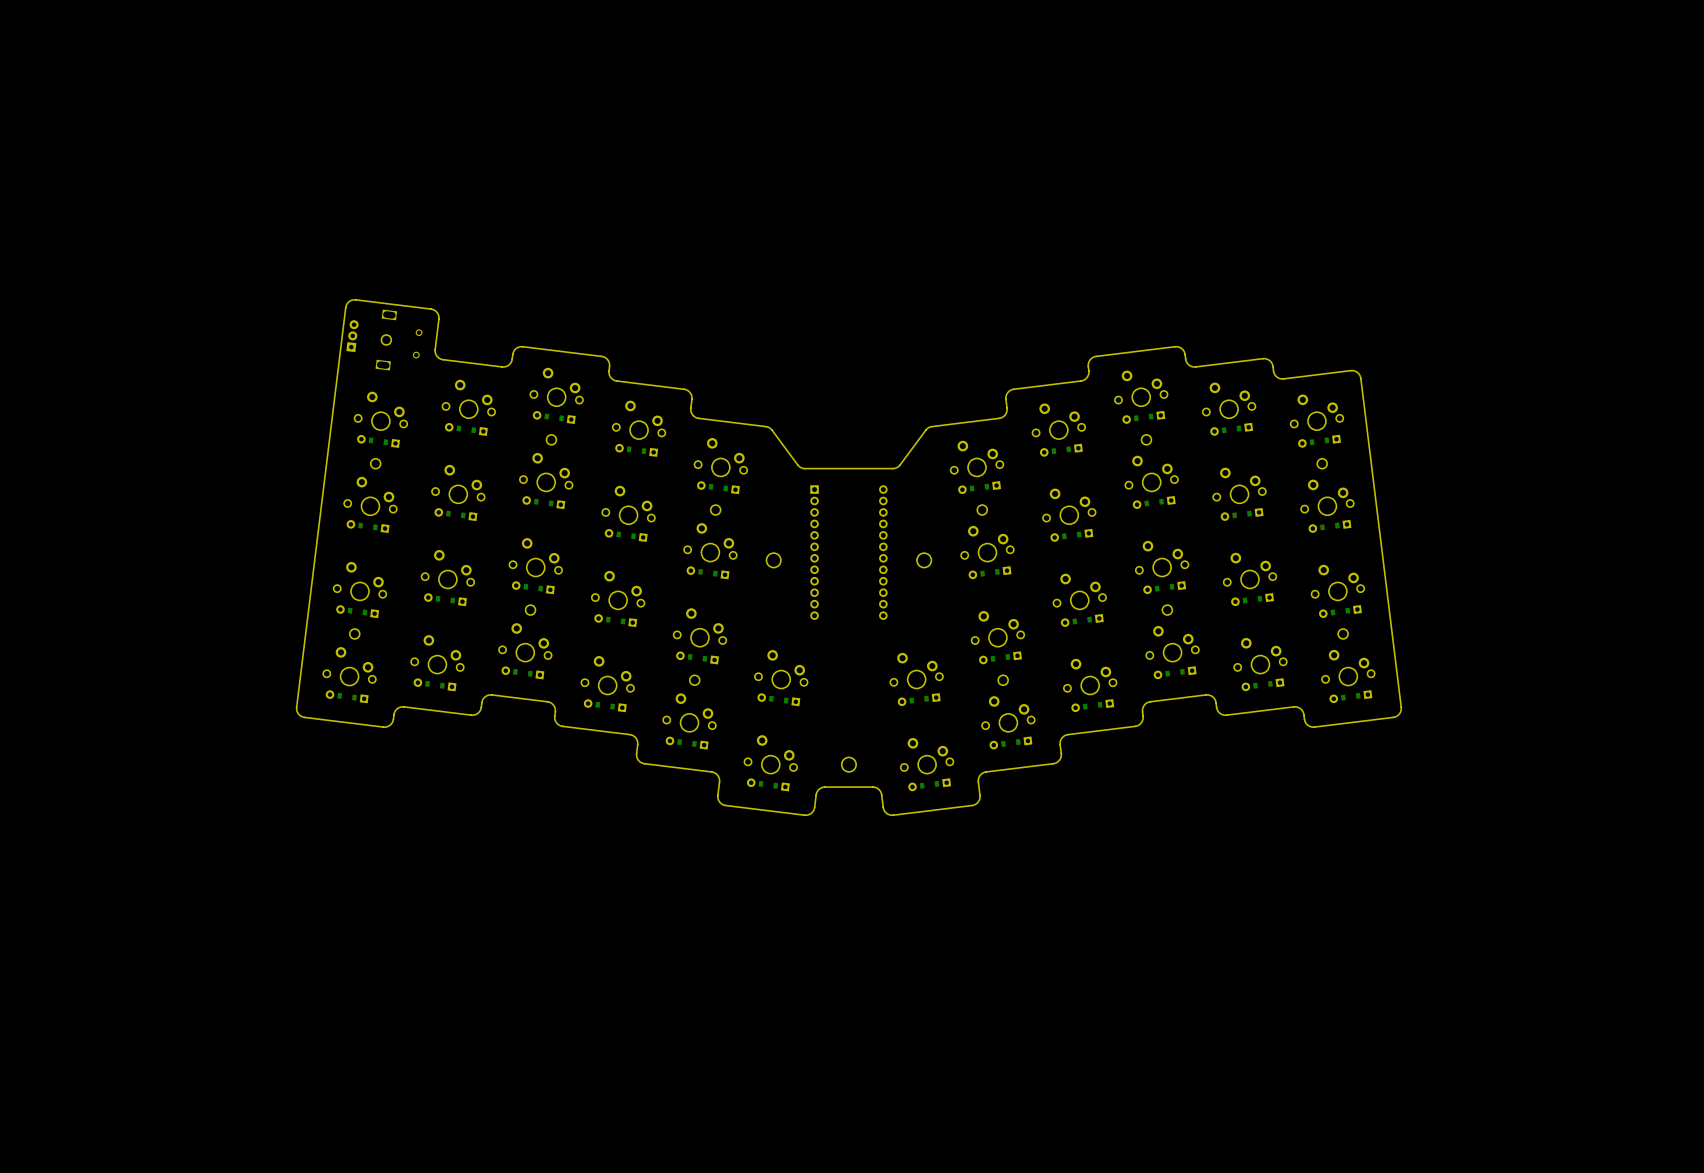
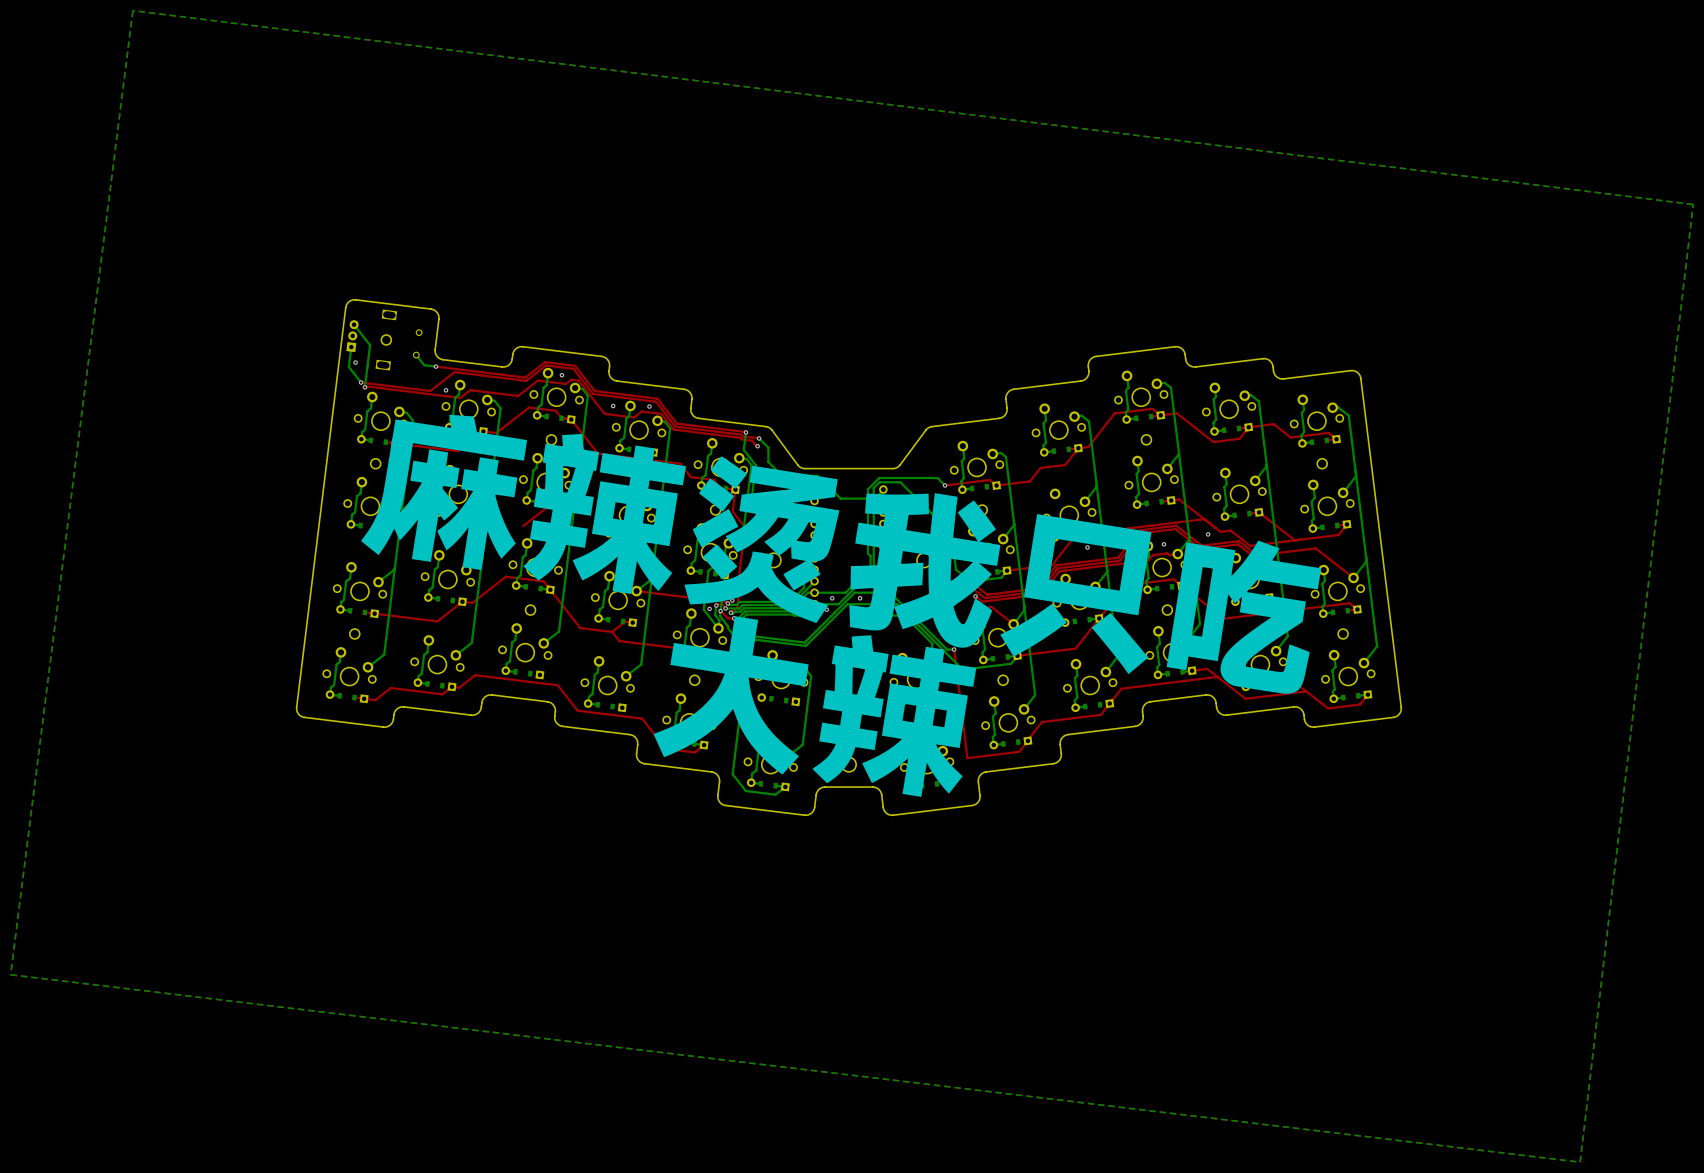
bottom zone outline: none -> (132, 10) (1693, 204) (1580, 1162) (10, 974) (132, 10)
bottom track: none -> (354, 324) (370, 345) (364, 387)
bottom track: none -> (351, 347) (348, 366) (361, 382)
bottom track: none -> (416, 355) (424, 365) (435, 366)
via: none -> (355, 362)
top track: none -> (435, 366) (525, 377) (545, 362) (575, 365) (594, 391) (657, 398) (677, 423) (745, 432)
via: none -> (435, 366)
bottom track: none -> (548, 373) (541, 404) (538, 407) (537, 415) (546, 416)
via: none -> (561, 375)
bottom track: none -> (1127, 375) (1128, 387) (1125, 390) (1128, 409) (1125, 412) (1126, 419) (1136, 418)
top track: none -> (361, 382) (430, 391) (454, 372) (526, 380) (545, 365) (573, 368) (593, 394) (655, 401) (675, 426) (759, 438)
via: none -> (361, 382)
bottom track: none -> (1156, 383) (1164, 382) (1170, 387) (1199, 624) (1188, 639)
bottom track: none -> (460, 385) (459, 394) (455, 397) (449, 427) (458, 428)
top track: none -> (364, 387) (460, 397) (470, 390) (518, 396) (537, 380) (565, 384) (571, 379) (578, 380) (604, 413) (634, 417) (641, 411) (661, 413) (673, 429) (740, 437) (752, 440) (757, 446)
via: none -> (364, 387)
bottom track: none -> (575, 387) (582, 388) (587, 395) (558, 631) (543, 643)
bottom track: none -> (1214, 387) (1216, 396) (1213, 399) (1216, 419) (1213, 422) (1214, 431) (1224, 430)
via: none -> (446, 390)
bottom track: none -> (1244, 395) (1250, 395) (1258, 401) (1287, 636) (1276, 651)
bottom track: none -> (372, 397) (370, 408) (367, 411) (365, 429) (362, 432) (361, 439) (371, 440)
bottom track: none -> (487, 399) (494, 400) (500, 408) (471, 642) (455, 655)
bottom track: none -> (1302, 399) (1304, 410) (1301, 412) (1304, 432) (1301, 435) (1302, 443) (1312, 442)
bottom track: none -> (630, 405) (624, 437) (620, 440) (619, 448) (629, 449)
via: none -> (613, 406)
via: none -> (649, 406)
bottom track: none -> (1332, 407) (1337, 407) (1348, 415) (1377, 646) (1364, 663)
bottom track: none -> (1044, 408) (1046, 420) (1043, 423) (1045, 442) (1043, 445) (1044, 452) (1053, 451)
bottom track: none -> (399, 411) (406, 412) (412, 420) (384, 654) (368, 667)
drawing: none -> [361, 414, 1322, 797]
top track: none -> (1160, 415) (1152, 408) (1114, 413) (1088, 446) (1068, 449)
bottom track: none -> (1074, 416) (1081, 415) (1088, 421) (1117, 656) (1105, 672)
top track: none -> (1151, 416) (1176, 413) (1213, 442) (1239, 438) (1248, 427)
top track: none -> (561, 418) (555, 410) (529, 407) (496, 433) (483, 431) (458, 451) (385, 442)
top track: none -> (561, 418) (571, 419) (597, 453) (680, 463) (690, 477) (714, 479) (720, 487) (735, 489)
bottom track: none -> (657, 420) (664, 421) (670, 428) (641, 664) (626, 676)
top track: none -> (1238, 428) (1273, 424) (1290, 437) (1328, 432) (1336, 439) (1326, 440)
bottom track: none -> (745, 432) (743, 449) (755, 465) (752, 496)
via: none -> (745, 432)
bottom track: none -> (759, 438) (768, 447) (768, 462) (782, 475) (817, 475) (840, 498) (874, 498) (883, 489)
via: none -> (759, 438)
bottom track: none -> (712, 443) (711, 453) (708, 455) (705, 475) (702, 477) (701, 485) (711, 486)
via: none -> (757, 446)
bottom track: none -> (962, 446) (964, 458) (961, 461) (963, 478) (961, 481) (962, 489) (972, 488)
top track: none -> (1078, 448) (1065, 464) (1040, 468) (1030, 481) (996, 485) (989, 480) (945, 485)
bottom track: none -> (992, 453) (1000, 452) (1005, 456) (1035, 695) (1024, 709)
bottom track: none -> (1179, 453) (1167, 468)
bottom track: none -> (537, 458) (536, 468) (533, 470) (530, 490) (527, 492) (526, 500) (536, 501)
bottom track: none -> (739, 458) (746, 459) (751, 465) (743, 532) (726, 545) (724, 558) (708, 570) (703, 609) (718, 628) (719, 620) (715, 615) (716, 605)
bottom track: none -> (1137, 461) (1139, 493) (1136, 497) (1137, 504) (1146, 503)
bottom track: none -> (1266, 464) (1255, 480)
bottom track: none -> (1225, 472) (1226, 484) (1224, 487) (1226, 505) (1224, 509) (1224, 516) (1234, 515)
bottom track: none -> (1356, 476) (1343, 492)
bottom track: none -> (361, 482) (350, 524) (360, 525)
bottom track: none -> (1313, 484) (1314, 497) (1311, 501) (1312, 528) (1322, 527)
bottom track: none -> (945, 485) (937, 478) (879, 478) (867, 489) (867, 494)
via: none -> (945, 485)
bottom track: none -> (1096, 486) (1084, 501)
top track: none -> (735, 489) (732, 511) (745, 527) (737, 607) (730, 612)
bottom track: none -> (873, 493) (873, 488) (879, 482) (900, 482) (951, 533) (956, 569) (971, 581) (1001, 577) (1007, 570) (997, 571)
top track: none -> (1161, 501) (1179, 499) (1220, 531) (1230, 530) (1250, 545) (1338, 534) (1346, 524) (1337, 525)
top track: none -> (552, 503) (523, 526)
bottom track: none -> (867, 507) (867, 553) (870, 556) (870, 567) (845, 592) (808, 592) (792, 608) (744, 608) (740, 611) (730, 612)
bottom track: none -> (873, 507) (873, 569) (838, 604) (801, 604) (793, 611) (745, 611) (738, 618) (734, 618)
top track: none -> (1249, 513) (1259, 512) (1294, 540)
top track: none -> (1204, 519) (1079, 534)
bottom track: none -> (1014, 524) (1003, 539)
bottom track: none -> (701, 528) (700, 537) (697, 540) (695, 560) (691, 563) (690, 570) (700, 571)
top track: none -> (1088, 533) (1075, 534) (1052, 565) (997, 571)
via: none -> (1208, 534)
bottom track: none -> (1189, 539) (1177, 554)
bottom track: none -> (527, 543) (520, 575) (517, 578) (516, 585) (525, 586)
via: none -> (1163, 544)
bottom track: none -> (1147, 546) (1147, 589) (1157, 588)
via: none -> (1087, 547)
top track: none -> (1177, 554) (1152, 555) (1148, 560) (1059, 571) (1041, 594) (982, 601) (975, 596)
bottom track: none -> (439, 555) (432, 587) (429, 590) (428, 597) (438, 598)
bottom track: none -> (1366, 561) (1353, 577)
top track: none -> (1265, 566) (1238, 544) (1200, 548) (1175, 529) (1141, 533) (1120, 560) (1057, 568) (1039, 591) (984, 598) (974, 590)
bottom track: none -> (351, 567) (350, 578) (346, 581) (340, 609) (350, 610)
bottom track: none -> (1106, 567) (1107, 571) (1095, 586)
bottom track: none -> (394, 568) (378, 582)
bottom track: none -> (814, 569) (804, 580) (804, 587) (789, 601) (739, 601) (736, 604) (727, 603)
bottom track: none -> (1323, 570) (1323, 613) (1332, 612)
bottom track: none -> (715, 573) (725, 574) (719, 615) (733, 635) (726, 698) (739, 716) (732, 774) (745, 791) (775, 794) (785, 786) (775, 785)
bottom track: none -> (609, 576) (608, 588) (605, 590) (603, 606) (599, 609) (598, 618) (608, 619)
bottom track: none -> (651, 577) (636, 591)
top track: none -> (1353, 577) (1315, 548) (1257, 555) (1238, 541) (1201, 545) (1176, 525) (1139, 530) (1118, 557) (1056, 565) (1038, 588) (987, 594) (974, 584) (962, 586)
bottom track: none -> (814, 581) (791, 605) (742, 605) (739, 608) (725, 608)
bottom track: none -> (540, 588) (550, 589)
top track: none -> (636, 591) (726, 602)
via: none -> (975, 596)
via: none -> (832, 598)
via: none -> (860, 598)
via: none -> (732, 600)
via: none -> (727, 603)
top track: none -> (716, 605) (722, 604) (725, 608)
via: none -> (716, 605)
bottom track: none -> (1024, 605) (1024, 609) (1013, 624)
via: none -> (709, 608)
via: none -> (725, 608)
top track: none -> (977, 608) (991, 606) (1013, 624)
via: none -> (826, 609)
top track: none -> (1347, 610) (1357, 609) (1349, 603) (1223, 618) (1173, 579) (1125, 585) (1075, 648) (1007, 656)
top track: none -> (720, 611) (727, 618) (734, 618)
via: none -> (720, 611)
top track: none -> (364, 612) (437, 621) (462, 601) (472, 602) (505, 576) (543, 581) (580, 628) (612, 631)
via: none -> (730, 612)
bottom track: none -> (691, 613) (689, 625) (686, 627) (684, 645) (681, 648) (680, 655) (690, 656)
bottom track: none -> (814, 615) (746, 614) (735, 623)
bottom track: none -> (883, 615) (904, 615) (932, 643) (932, 666)
bottom track: none -> (983, 616) (984, 626) (982, 629) (985, 649) (982, 652) (983, 659) (993, 658)
via: none -> (734, 618)
bottom track: none -> (1099, 618) (1089, 619)
top track: none -> (623, 621) (632, 622) (625, 621) (612, 631)
bottom track: none -> (516, 628) (515, 640) (512, 642) (509, 661) (506, 663) (505, 670) (515, 671)
top track: none -> (612, 631) (619, 641) (697, 650) (703, 658)
bottom track: none -> (1158, 631) (1159, 643) (1157, 647) (1159, 664) (1157, 667) (1157, 674) (1167, 673)
bottom track: none -> (428, 640) (427, 652) (424, 655) (421, 673) (418, 676) (417, 682) (427, 683)
bottom track: none -> (743, 641) (750, 635) (804, 642) (854, 592) (890, 592) (947, 649) (954, 649)
bottom track: none -> (740, 645) (747, 646) (755, 639) (805, 645) (847, 604) (897, 604) (957, 664) (957, 670) (1011, 663) (1017, 655) (1007, 656)
top track: none -> (954, 649) (967, 758) (1019, 751) (1041, 722) (1100, 714) (1121, 688) (1217, 677)
via: none -> (954, 649)
bottom track: none -> (340, 652) (339, 662) (336, 664) (334, 685) (330, 687) (330, 694) (339, 695)
bottom track: none -> (1334, 655) (1335, 666) (1332, 670) (1333, 698) (1343, 697)
bottom track: none -> (599, 661) (597, 672) (594, 674) (592, 694) (588, 696) (588, 703) (597, 704)
bottom track: none -> (1076, 664) (1077, 675) (1074, 678) (1077, 697) (1074, 700) (1075, 707) (1085, 706)
bottom track: none -> (799, 670) (807, 671) (811, 676) (802, 744) (789, 755)
bottom track: none -> (1192, 670) (1182, 671)
top track: none -> (1182, 671) (1207, 668) (1245, 698) (1306, 691)
top track: none -> (1270, 683) (1293, 681) (1328, 708) (1360, 704) (1367, 694) (1358, 695)
bottom track: none -> (1367, 694) (1358, 695)
top track: none -> (354, 697) (375, 700) (390, 688) (442, 694) (452, 686) (459, 687) (475, 675) (557, 685) (577, 710) (642, 718) (665, 748) (694, 752) (704, 745) (694, 743)
bottom track: none -> (680, 698) (674, 731) (670, 734) (669, 740) (679, 742)
bottom track: none -> (994, 701) (995, 713) (992, 716) (995, 734) (992, 737) (993, 745) (1003, 743)
bottom track: none -> (762, 740) (756, 770) (752, 773) (751, 782) (760, 783)
bottom track: none -> (694, 743) (704, 745)

